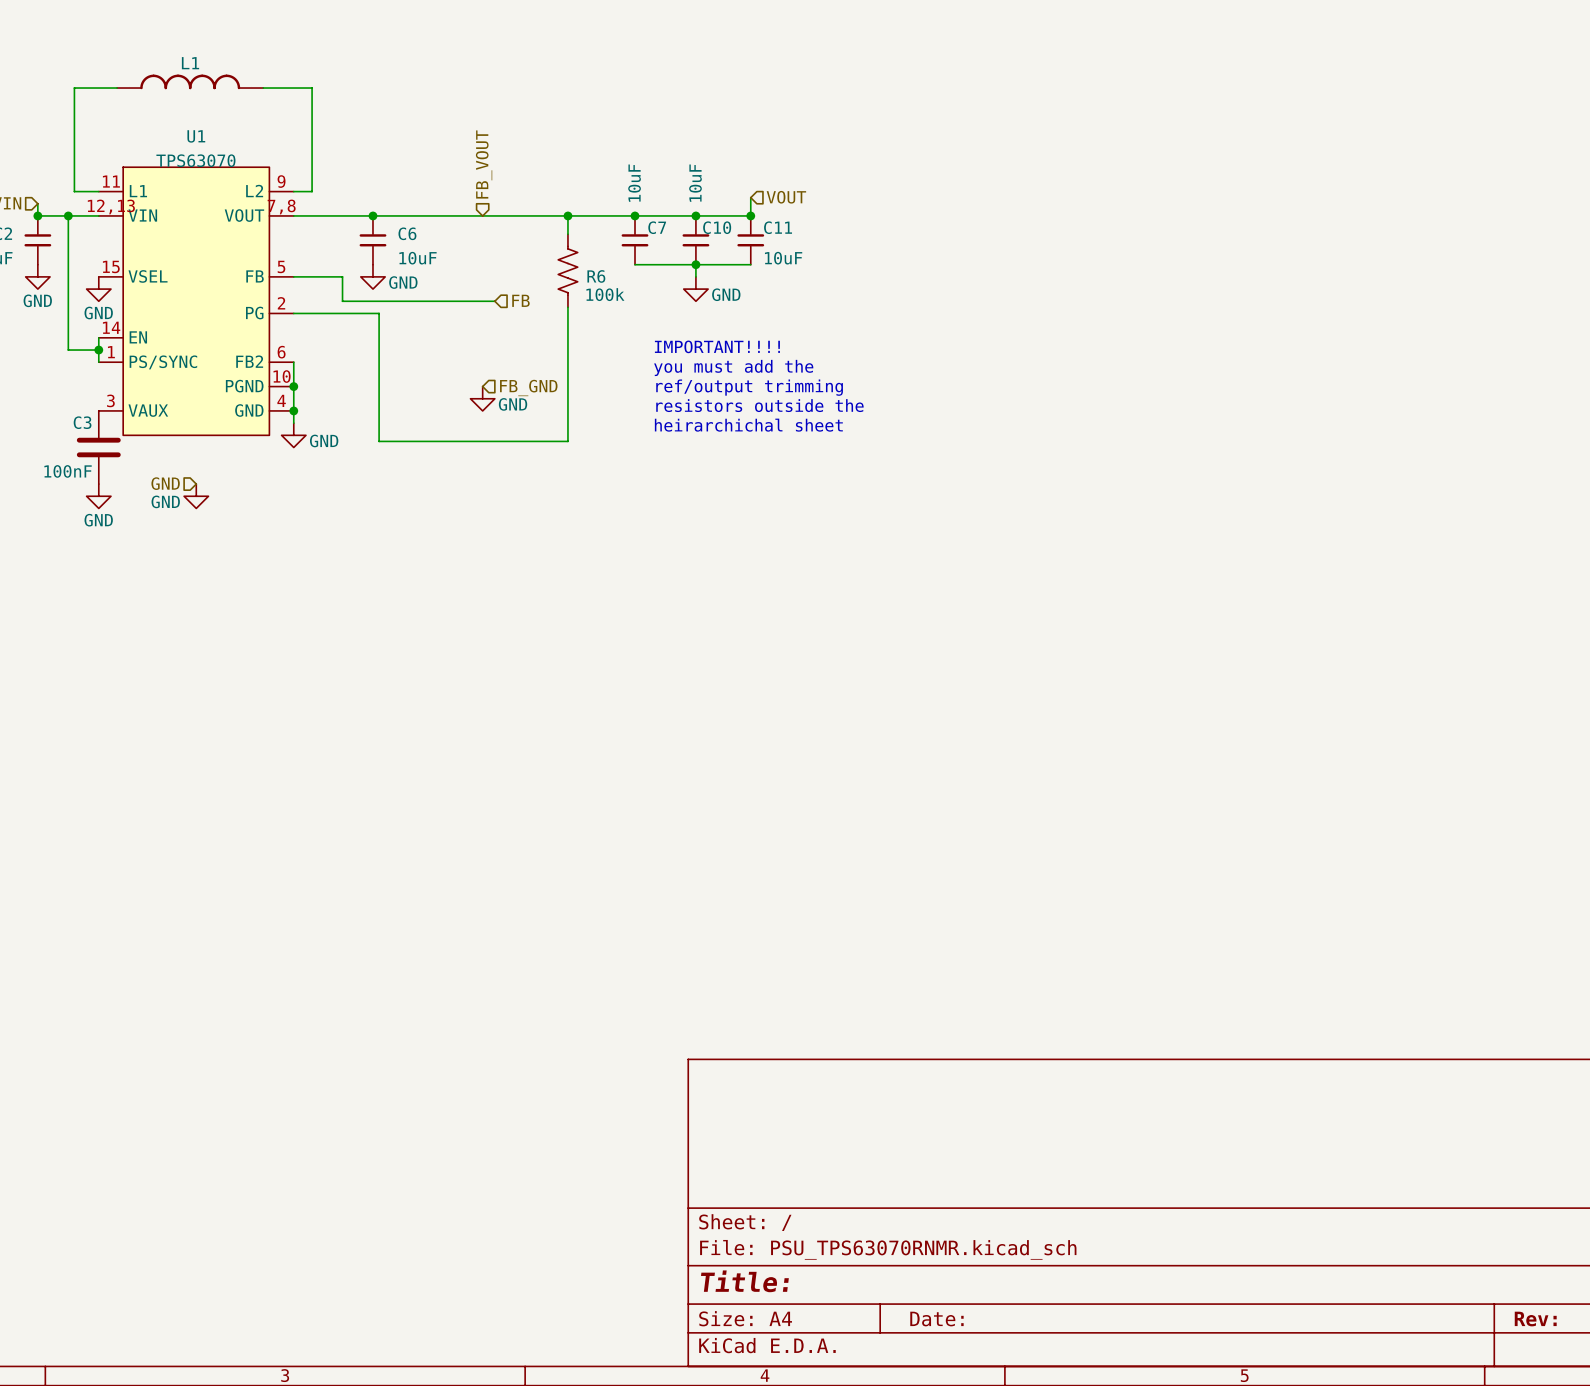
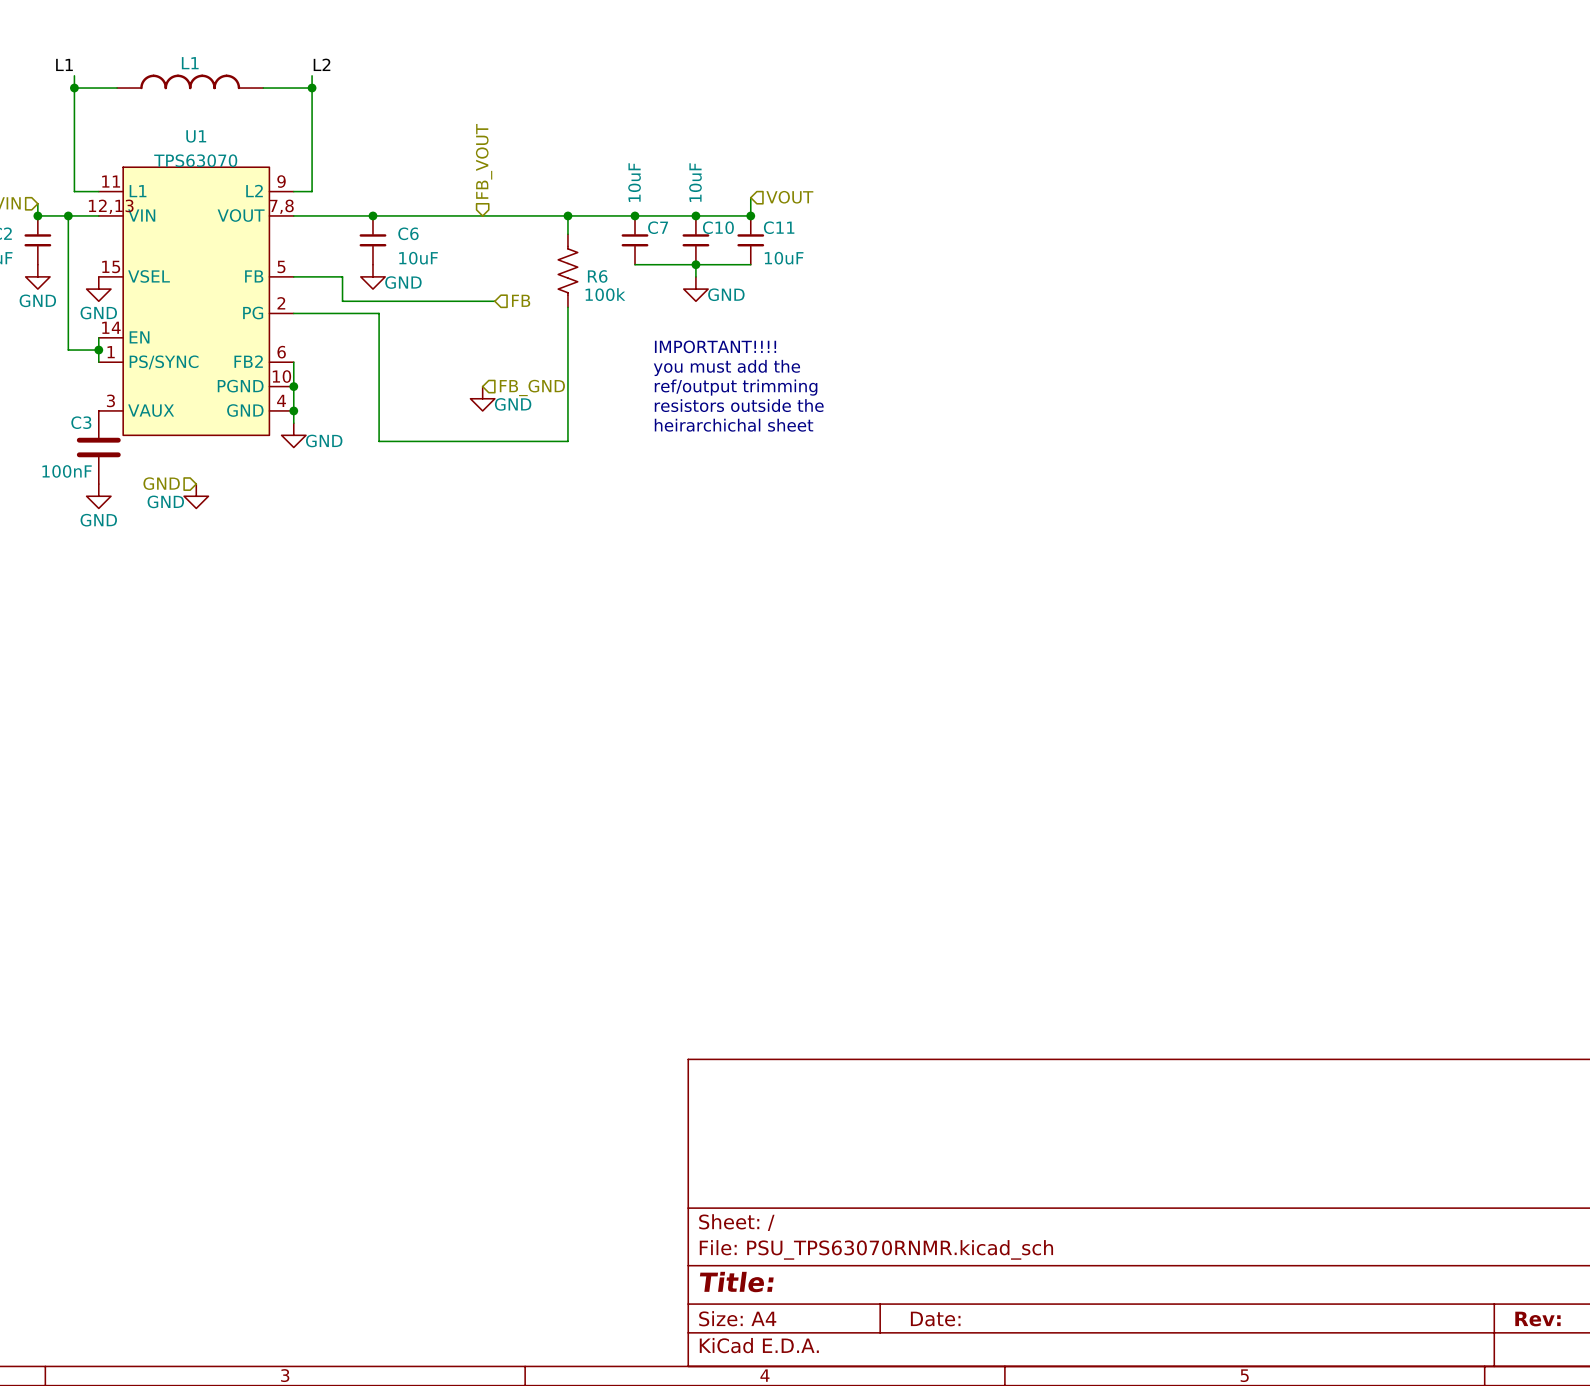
label: none -> L1 (64, 64)
label: none -> L2 (322, 64)
wire: none -> (74, 75) (74, 88)
wire: none -> (312, 75) (312, 88)
junction: none -> (74, 88)
junction: none -> (312, 88)

